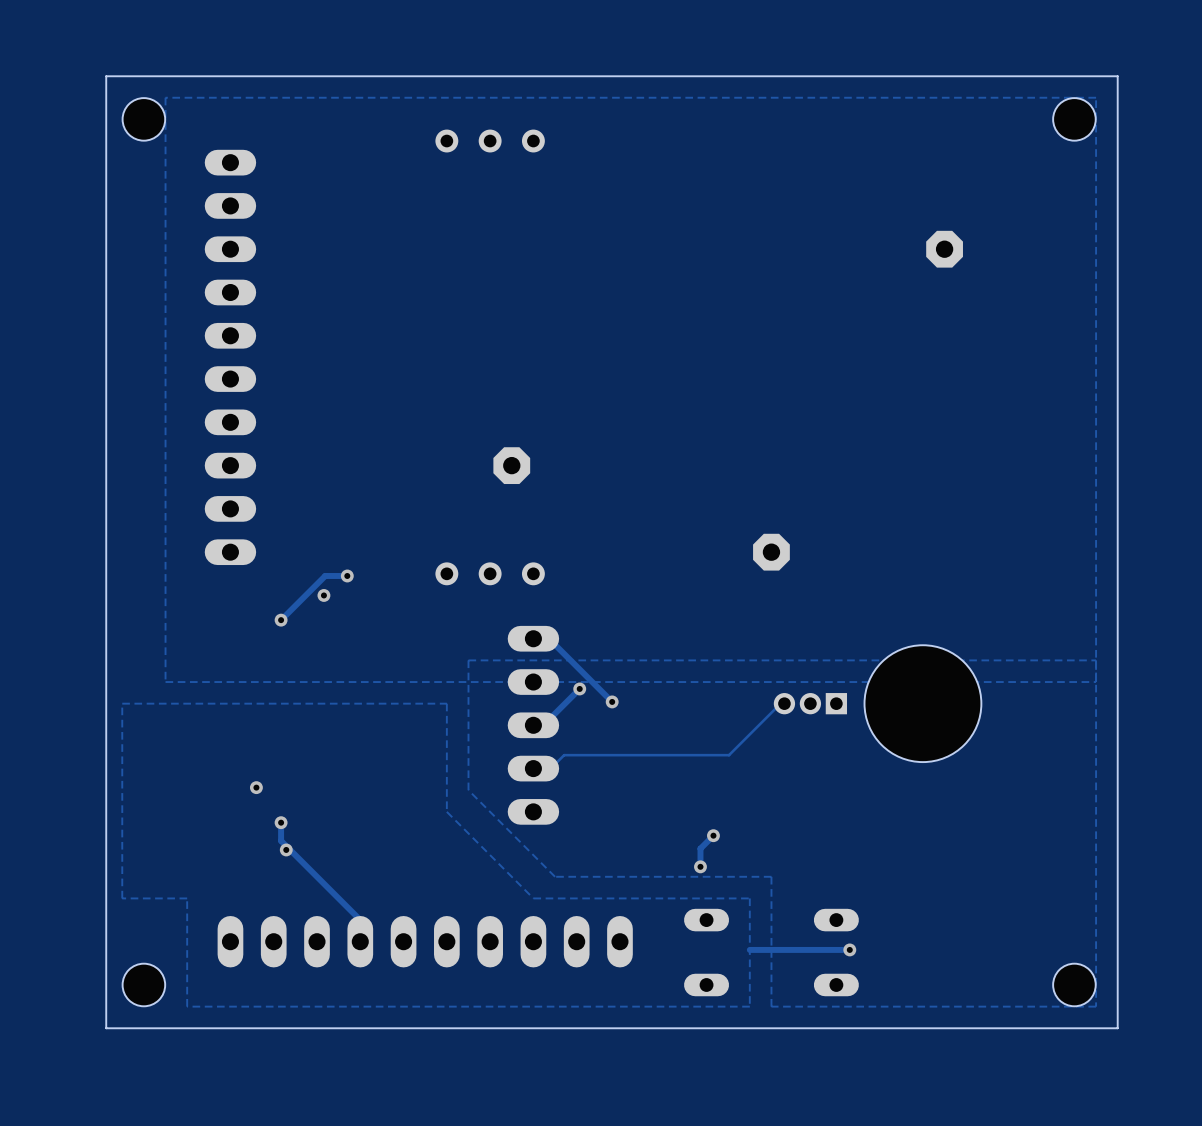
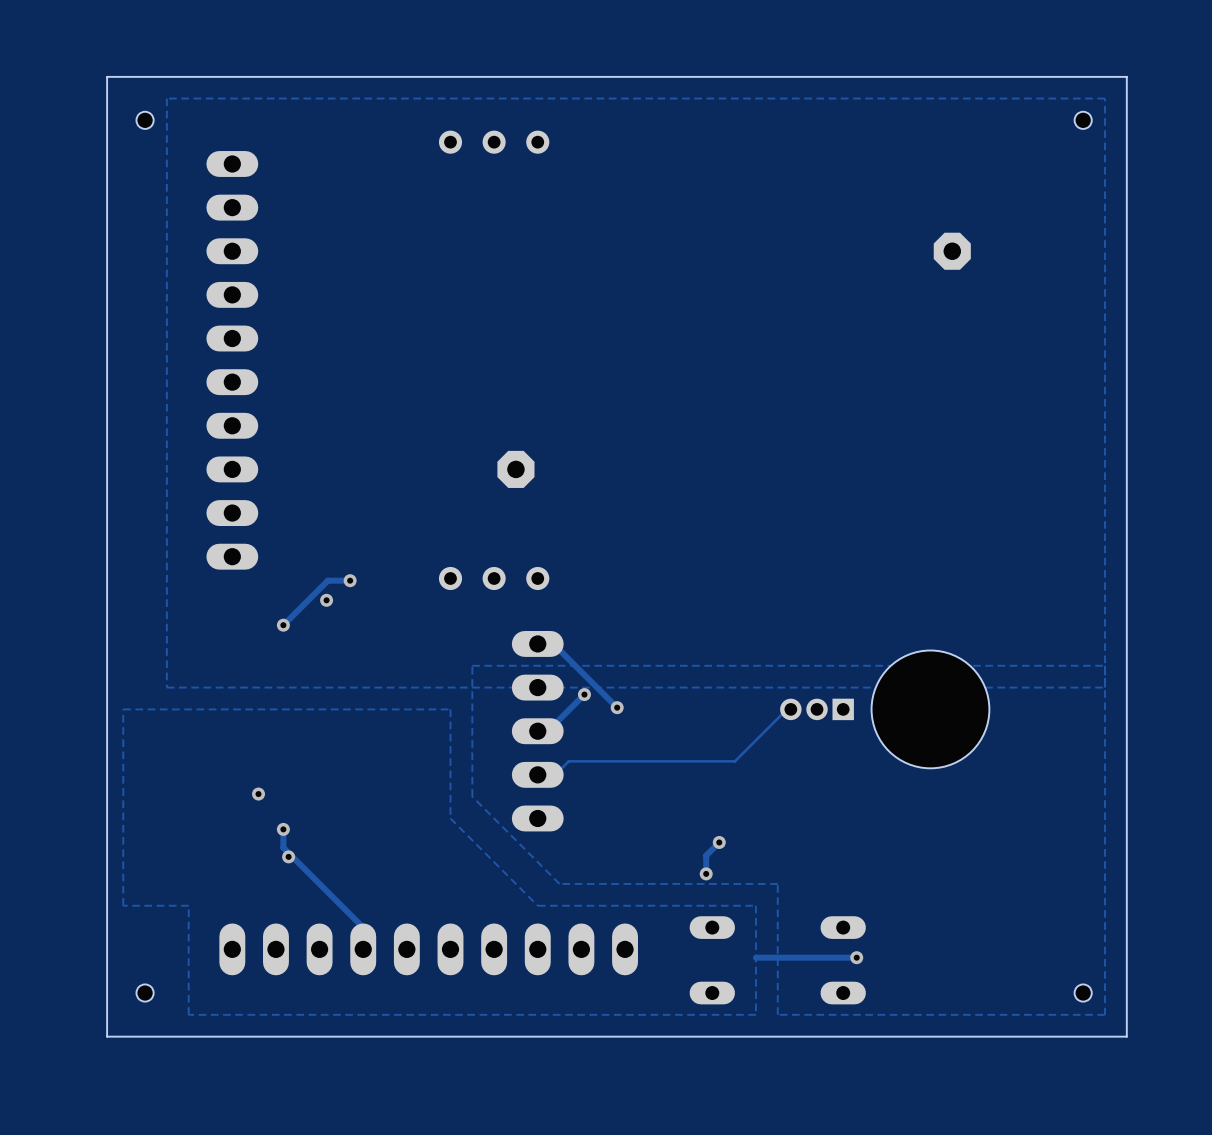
hole size: [122, 98, 166, 141] -> [136, 111, 154, 129]
hole size: [1053, 98, 1096, 141] -> [1074, 111, 1092, 129]
part: (771, 552) -> none
hole size: [122, 963, 166, 1007] -> [136, 984, 154, 1002]
hole size: [1053, 963, 1096, 1007] -> [1074, 984, 1092, 1002]

